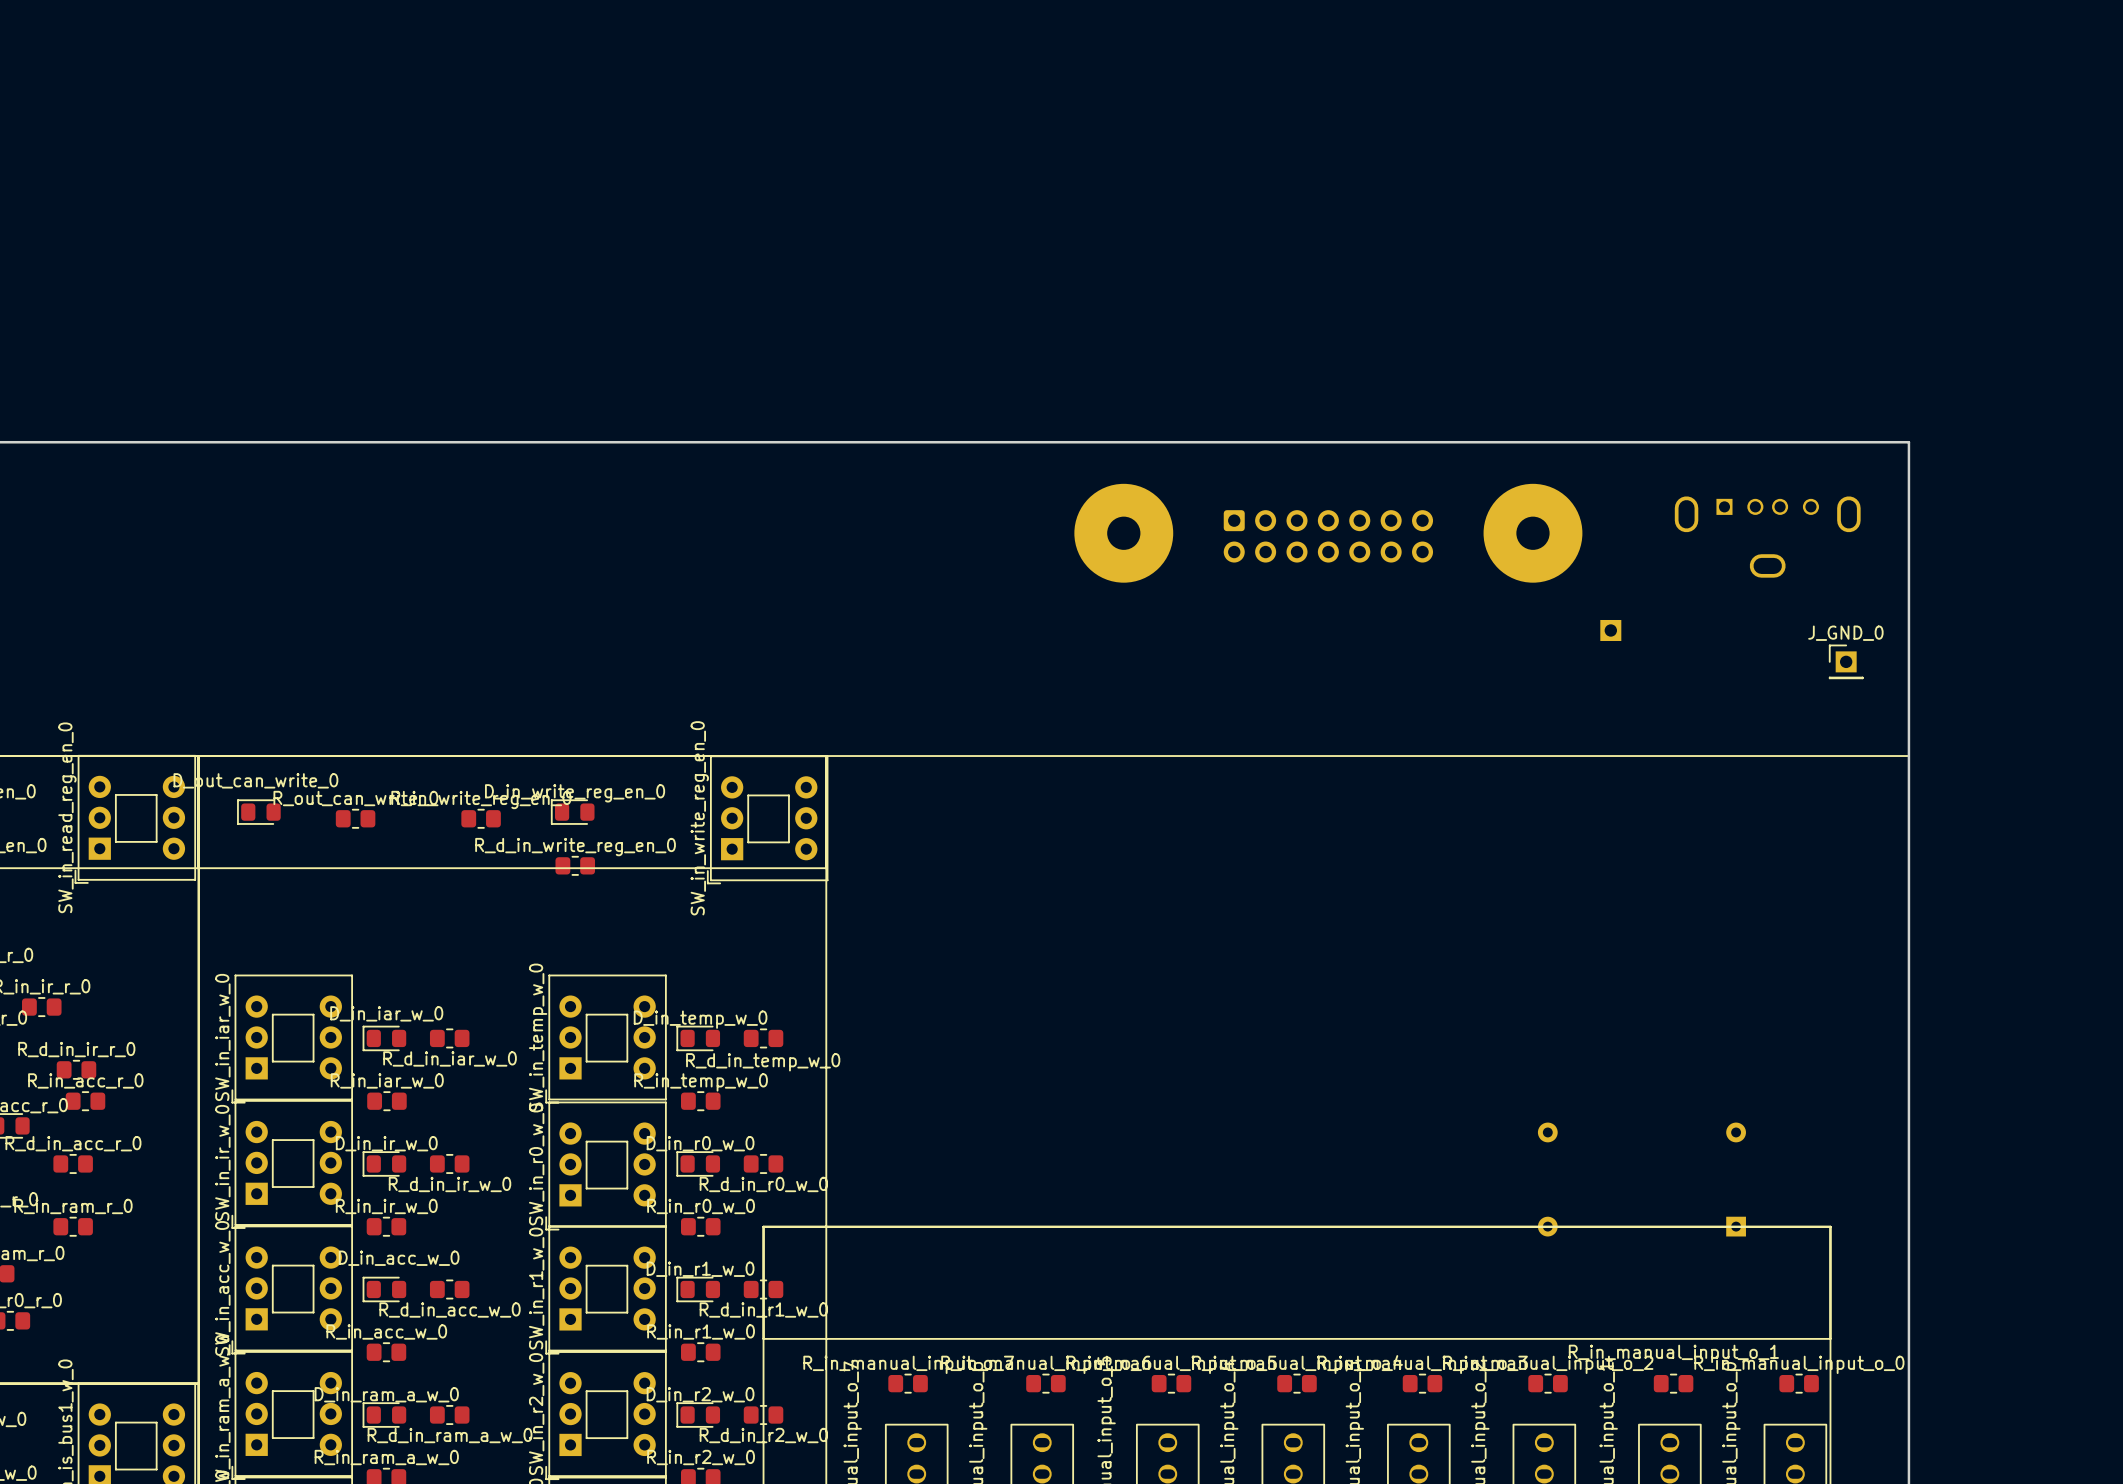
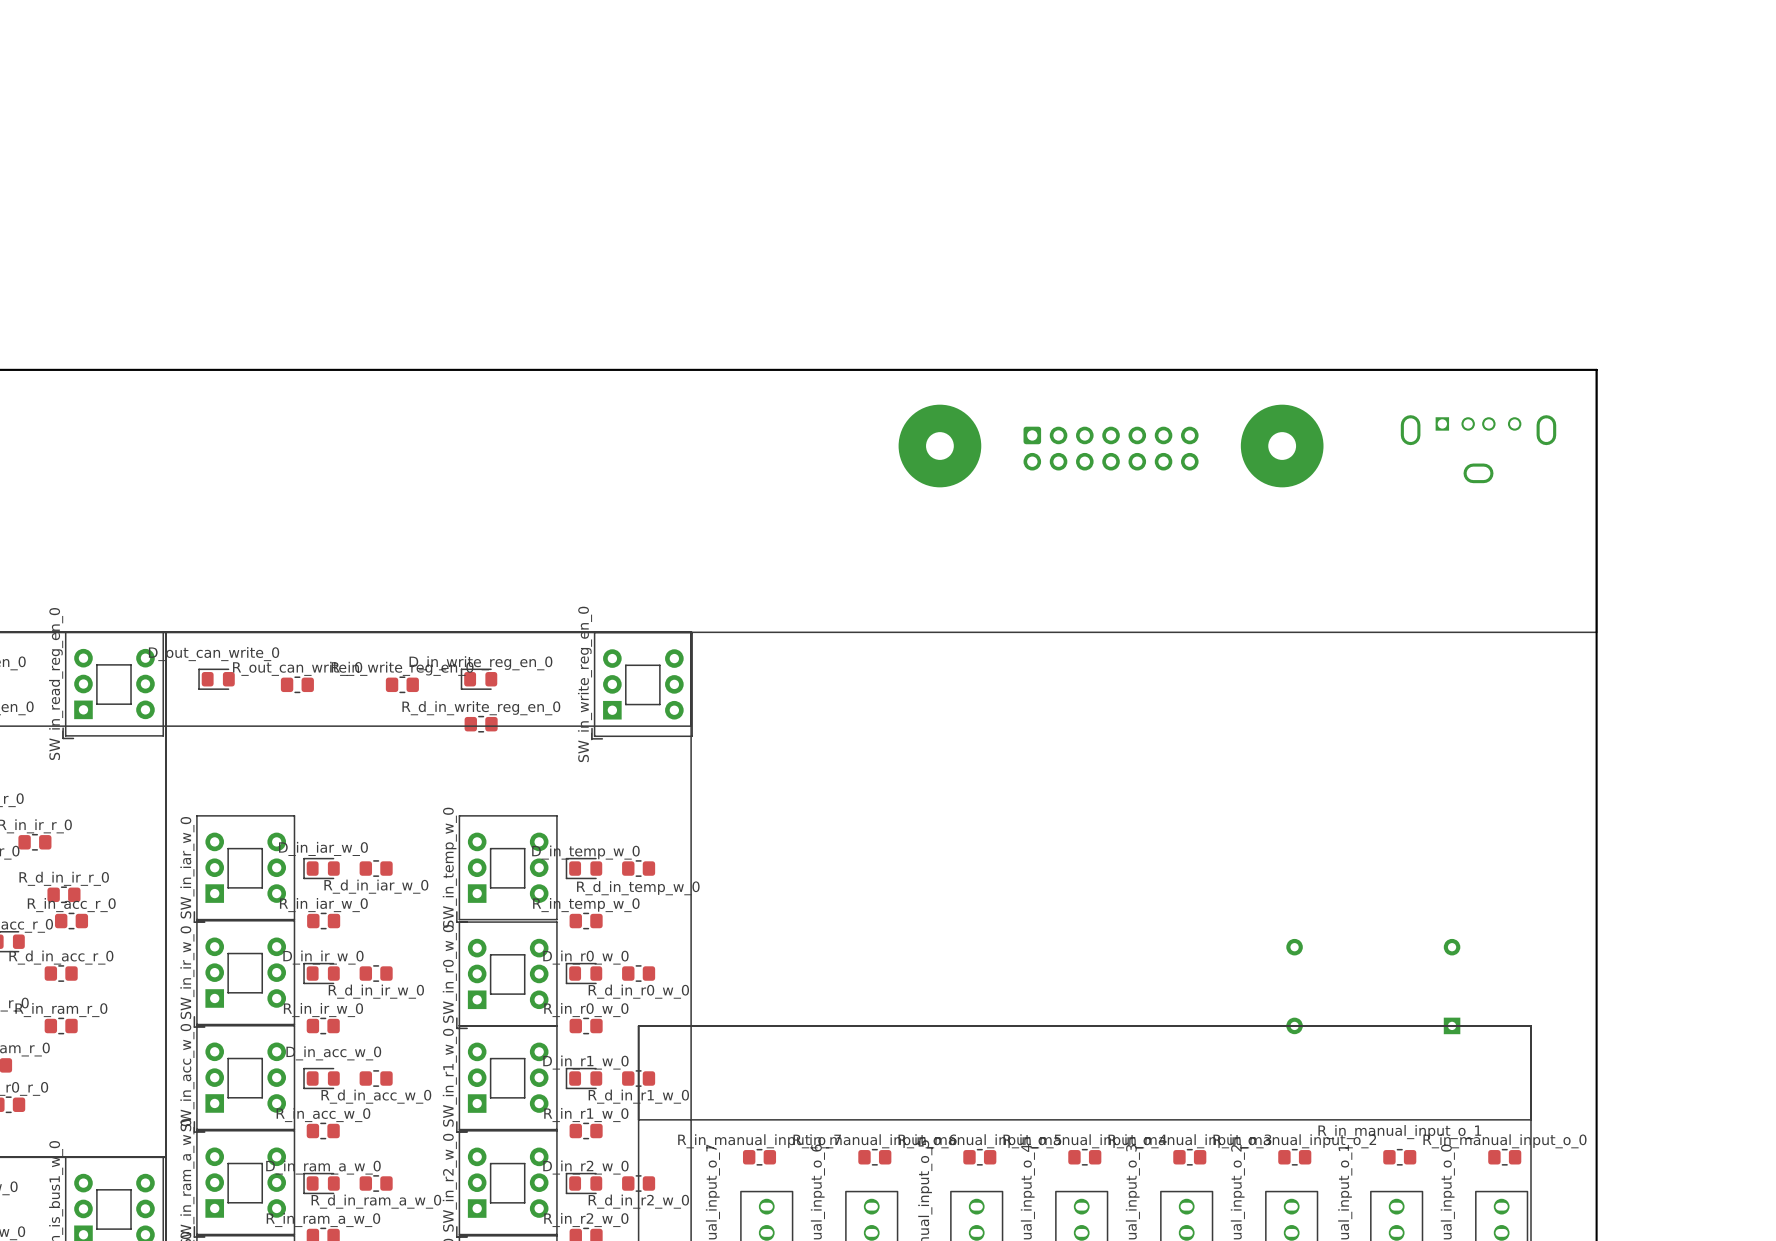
part: (1610, 630) -> none
J_GND_0: (1846, 661) -> none

